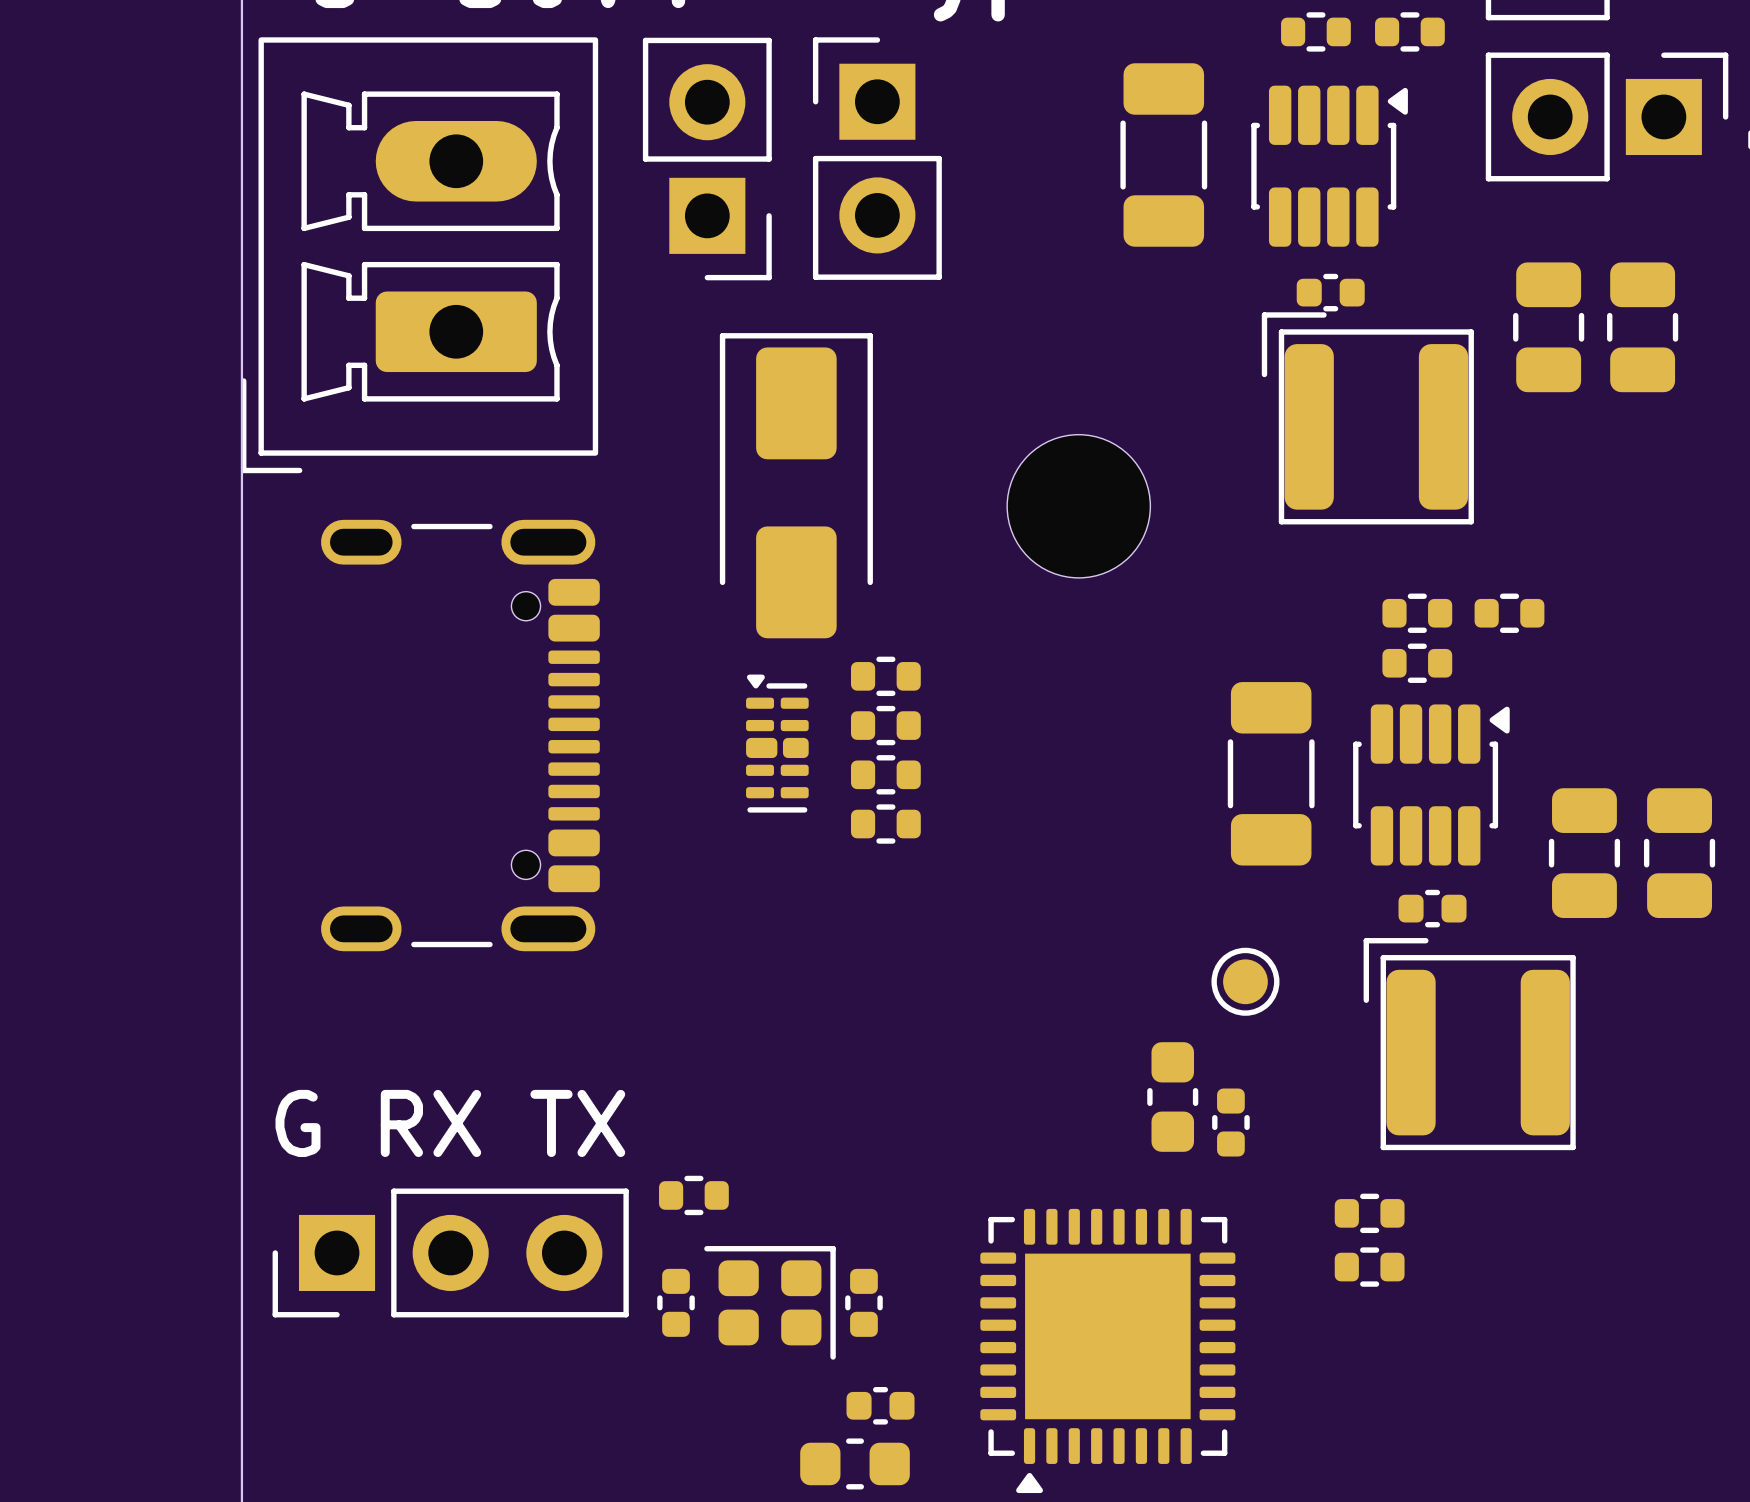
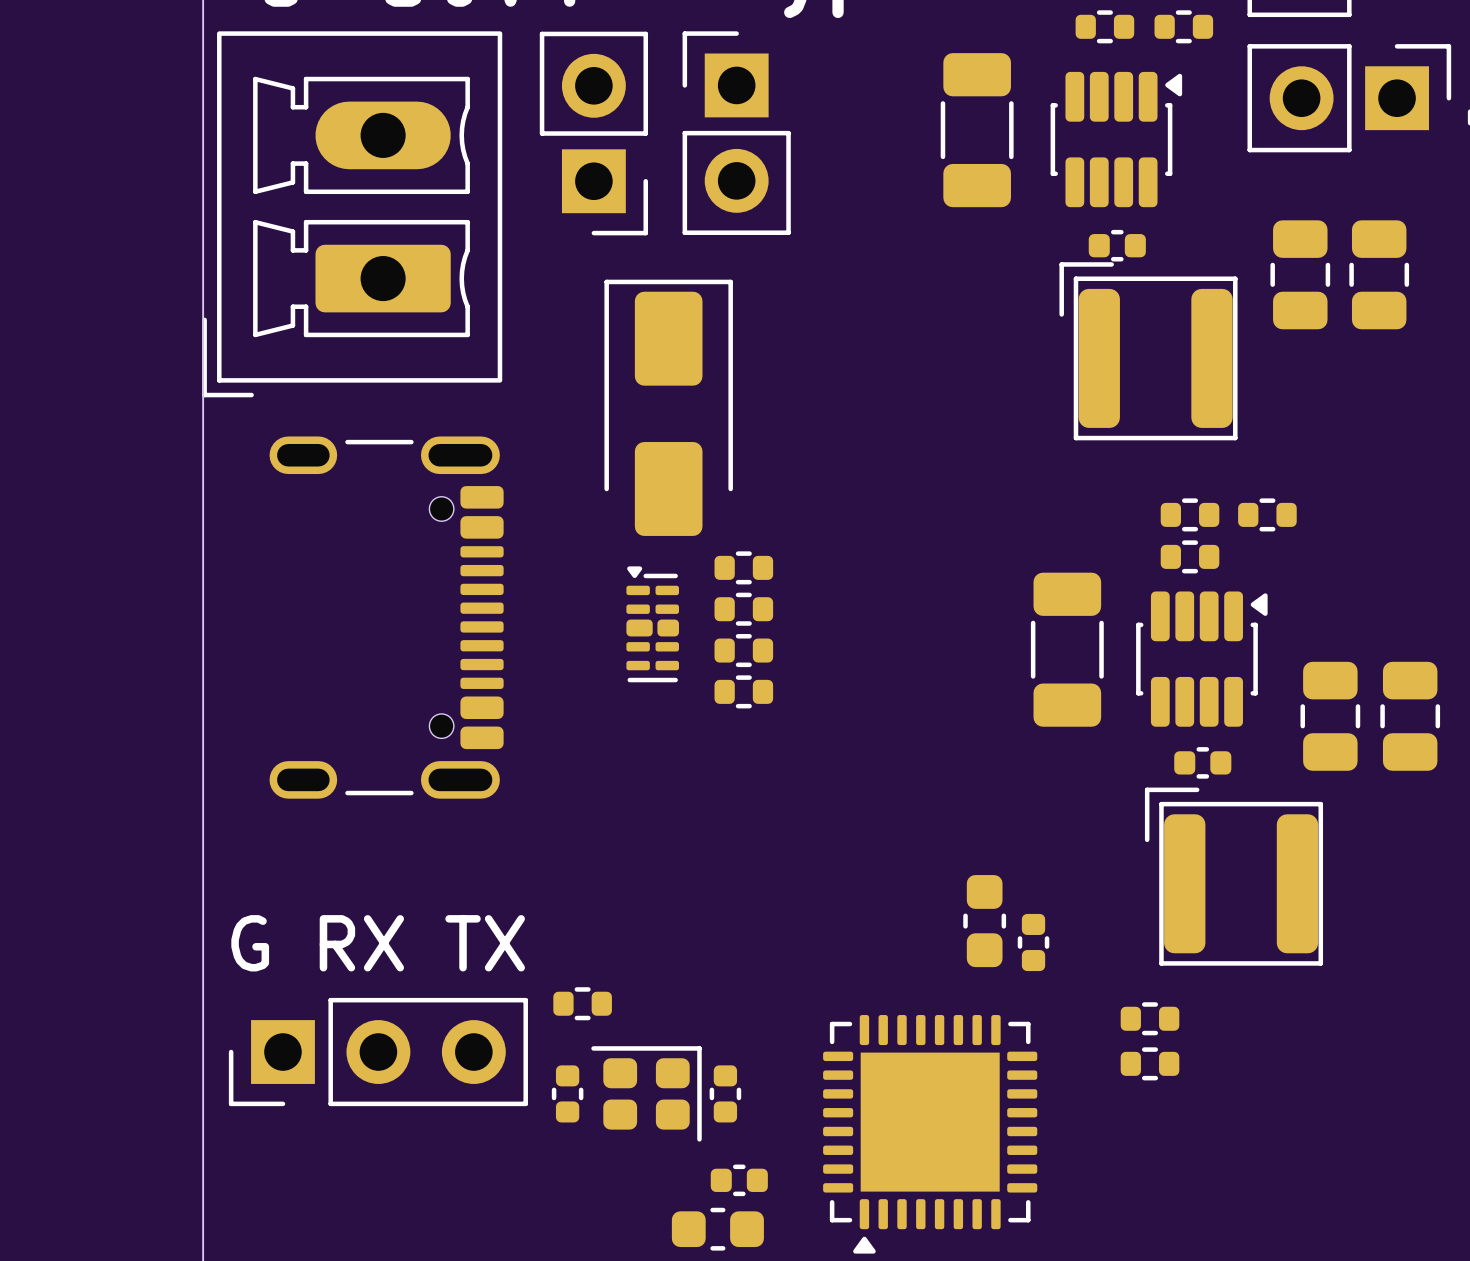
part: (1078, 506) -> none
part: (1245, 981) -> none

